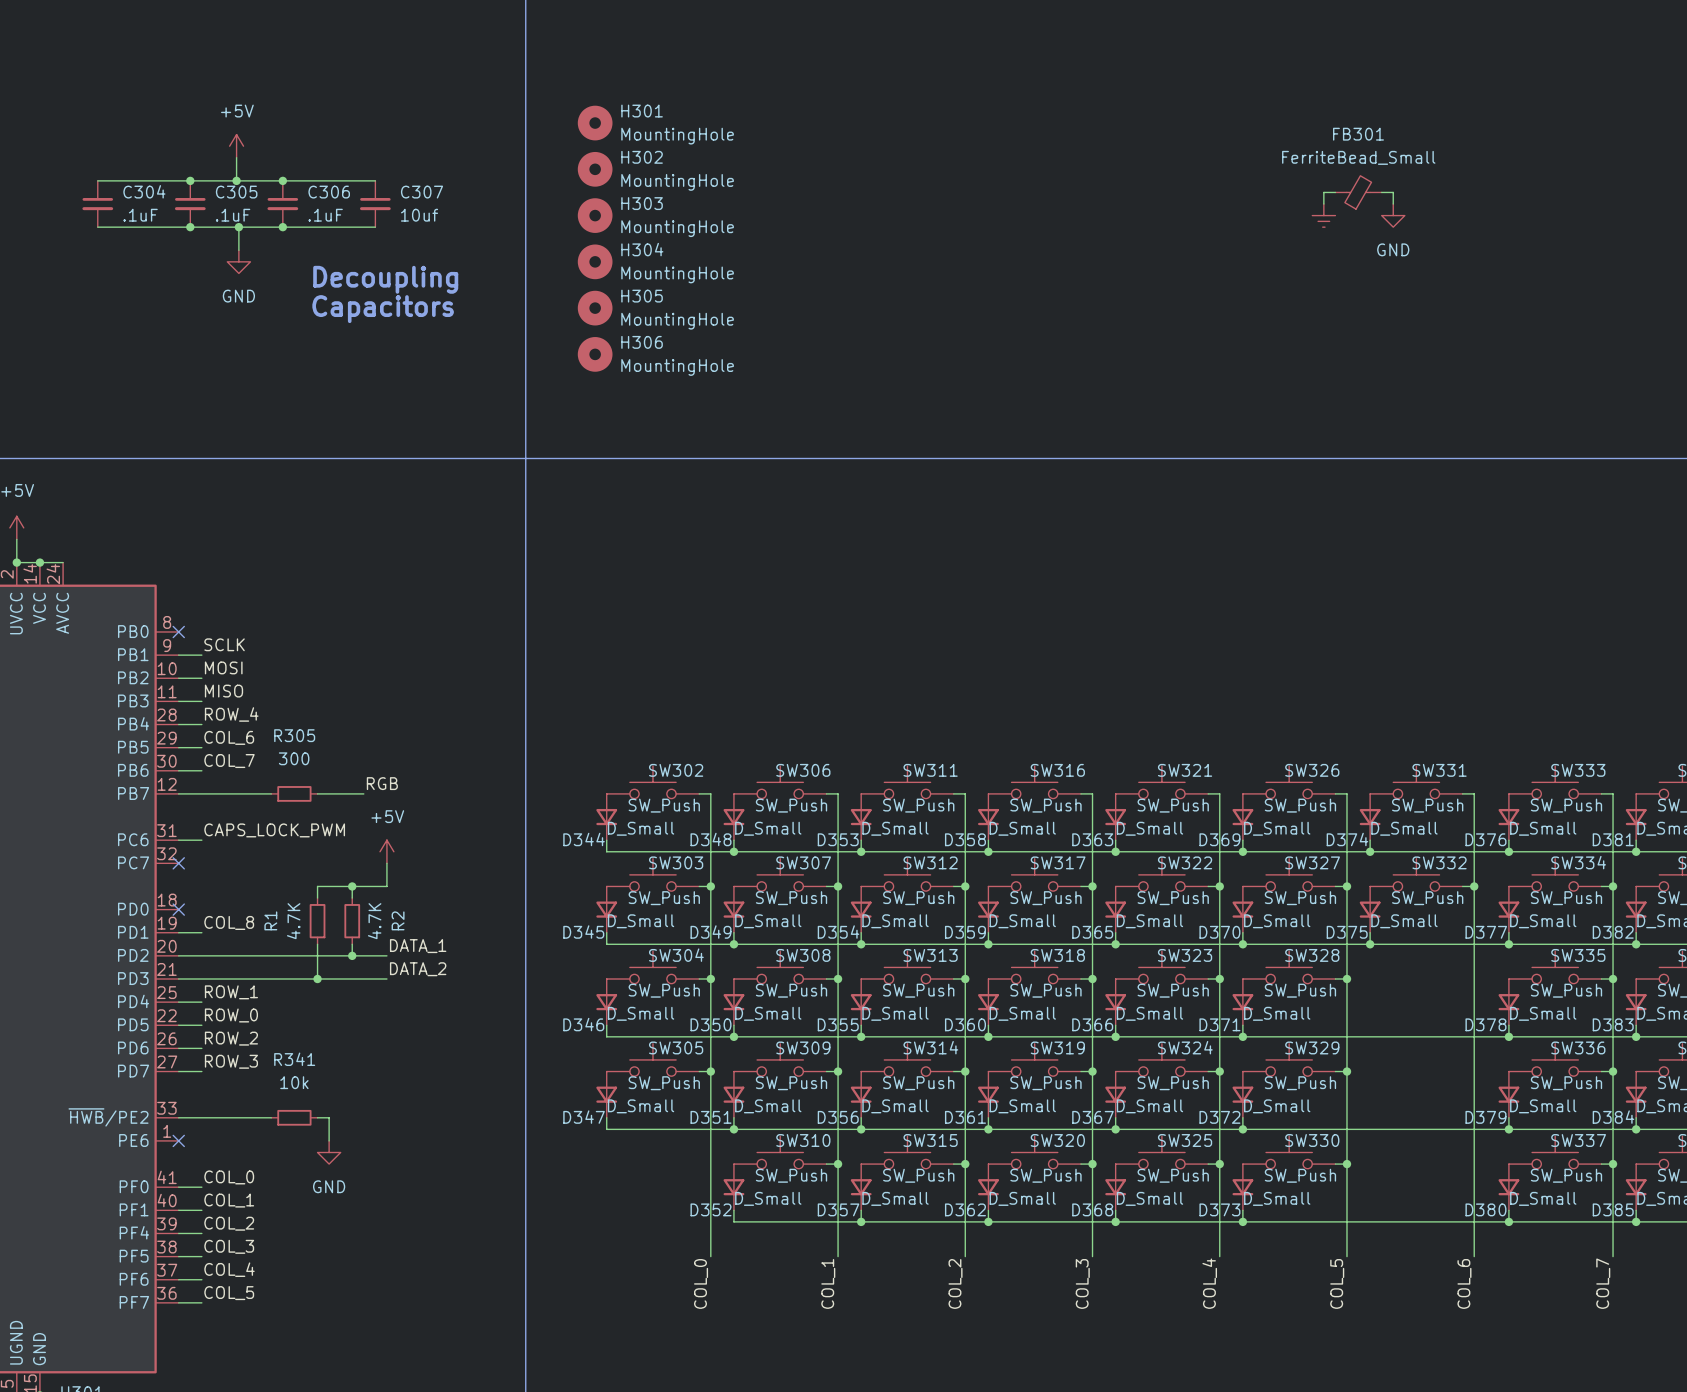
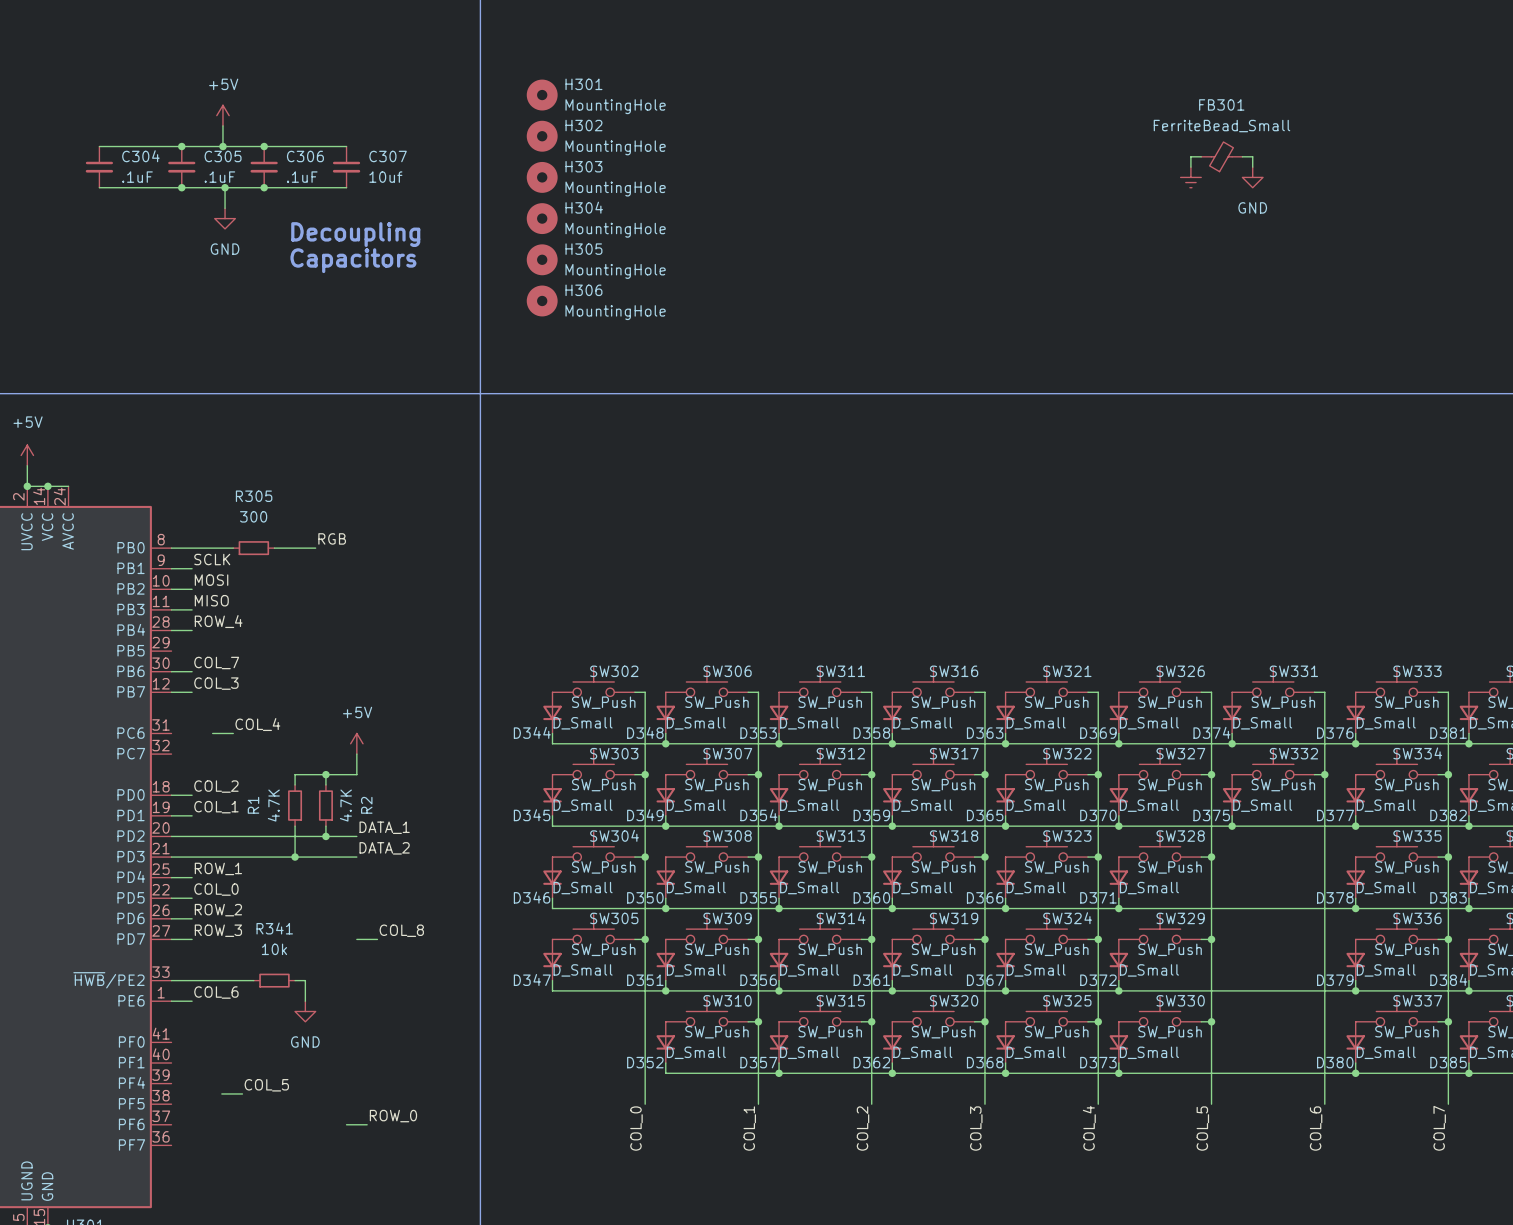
no-connect mark: (178, 631) -> none
label: COL_6 (229, 737) -> none
wire: (178, 747) (201, 747) -> (171, 795) (192, 795)
label position: RGB (382, 783) -> RGB (332, 538)
label: none -> COL_3 (216, 683)
wire: (201, 793) (271, 793) -> (171, 548) (233, 548)
R305 position: (294, 793) -> (253, 548)
wire: (317, 793) (363, 793) -> (274, 548) (315, 548)
label: CAPS_LOCK_PWM (274, 830) -> none
label: none -> COL_4 (257, 724)
wire: (178, 840) (201, 840) -> (212, 733) (233, 733)
no-connect mark: (178, 863) -> none
label: none -> COL_2 (216, 786)
no-connect mark: (178, 909) -> none
label: COL_8 (229, 922) -> COL_1 (216, 807)
label: ROW_0 (231, 1015) -> COL_0 (216, 889)
label: none -> COL_8 (401, 930)
wire: none -> (356, 939) (377, 939)
label: none -> COL_6 (216, 992)
no-connect mark: (178, 1140) -> none
label: COL_0 (229, 1177) -> none
wire: (178, 1187) (201, 1187) -> (171, 1001) (192, 1001)
label: COL_1 (229, 1200) -> none
wire: (178, 1210) (201, 1210) -> none
label: COL_2 (229, 1223) -> none
wire: (178, 1233) (201, 1233) -> none
label: COL_3 (229, 1246) -> none
wire: (178, 1256) (201, 1256) -> (221, 1093) (242, 1093)
label: COL_4 (229, 1269) -> none
label: none -> ROW_0 (393, 1116)
wire: (178, 1279) (201, 1279) -> (346, 1124) (367, 1124)
label position: COL_5 (229, 1293) -> COL_5 (266, 1085)
wire: (178, 1302) (201, 1302) -> none

